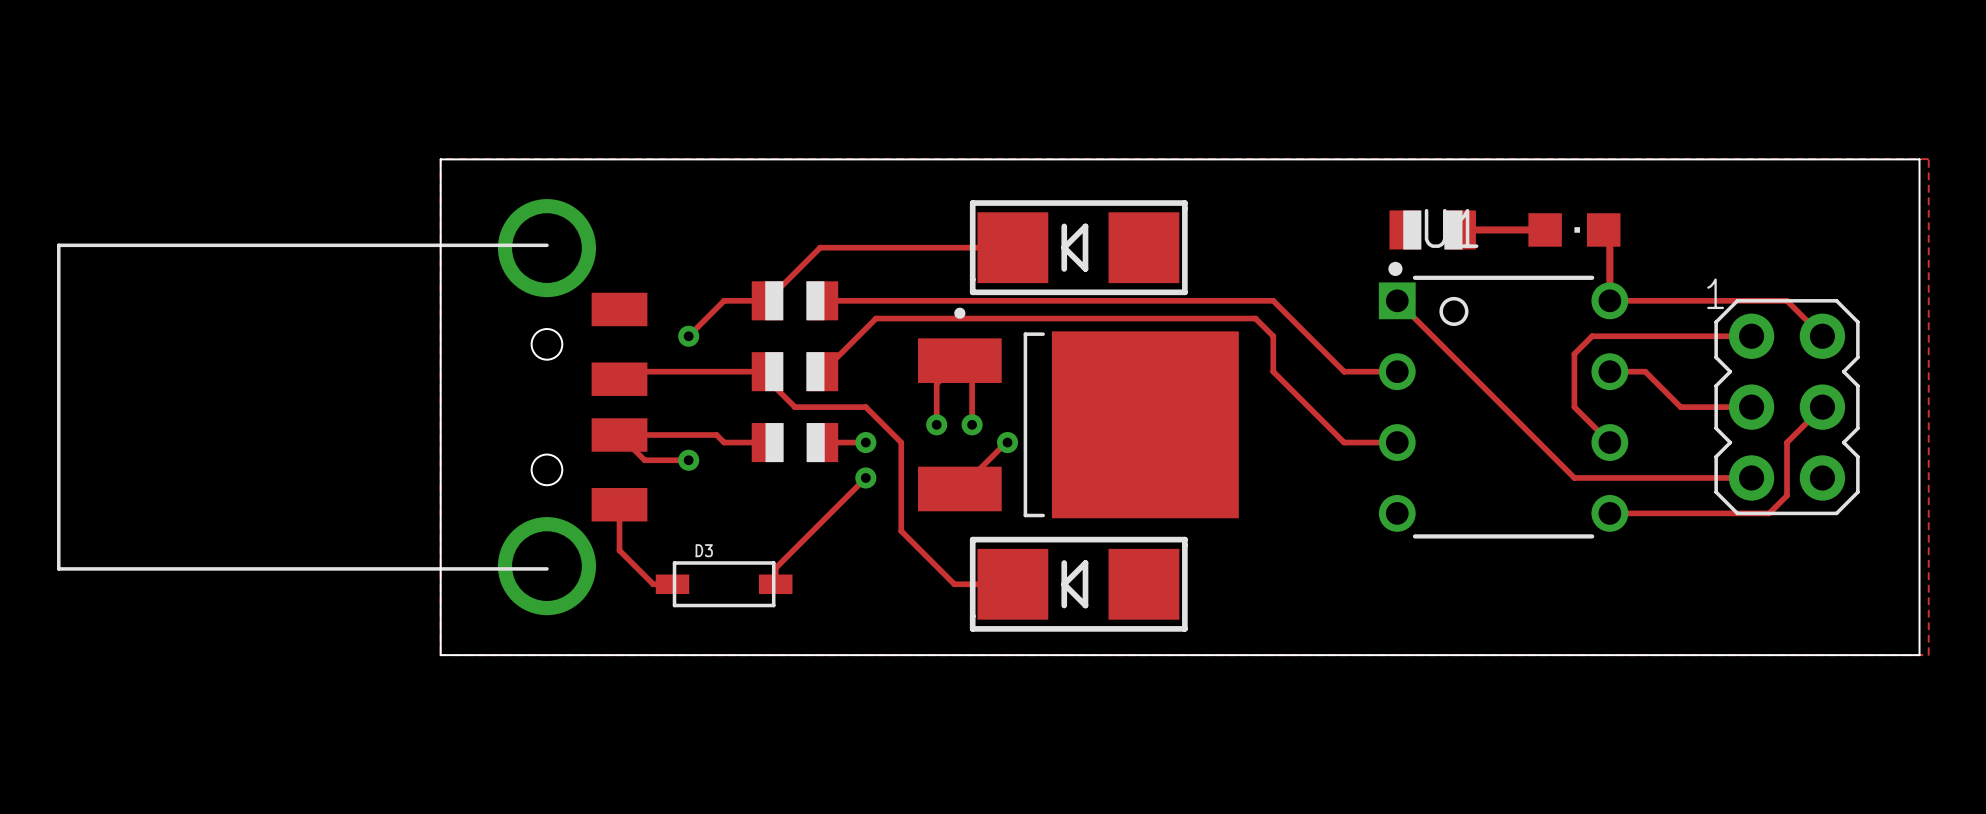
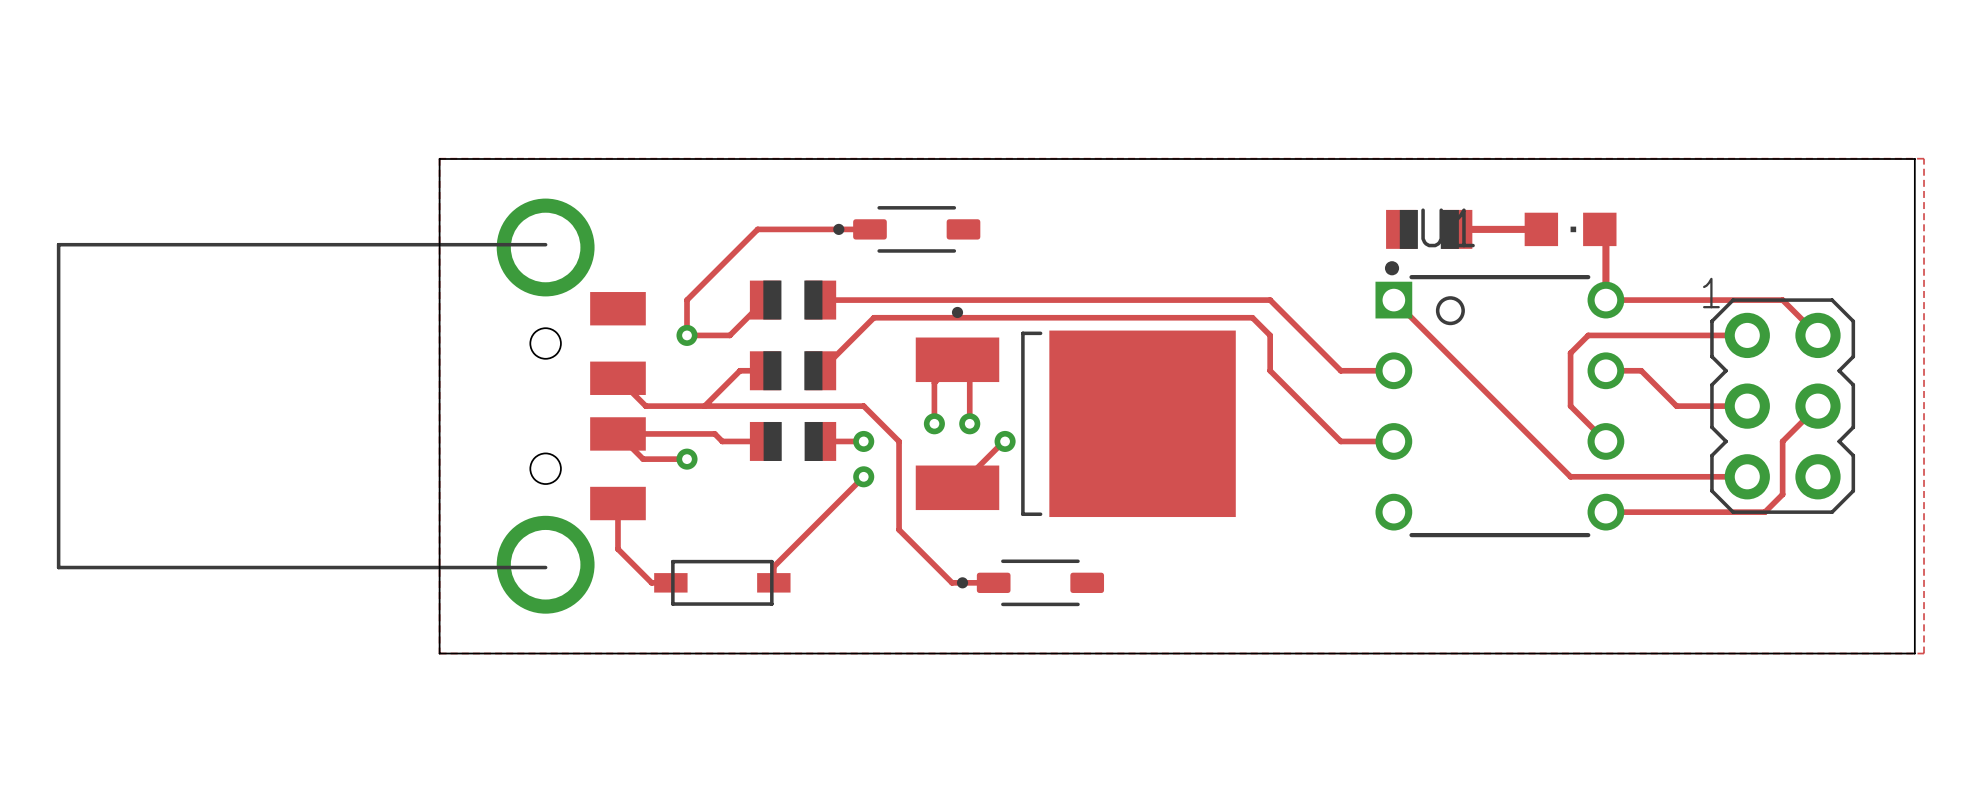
track: none -> (869, 229) (757, 229) (687, 300) (687, 335) (729, 335) (765, 300)
part: none -> (906, 229)
track: (1012, 247) (820, 247) (767, 300) (724, 300) (688, 336) -> none
part: (1078, 247) -> none
track: (627, 371) (741, 371) -> (704, 406) (740, 370)
track: (767, 379) (794, 407) -> (617, 378) (645, 406) (793, 406)
D3 name: D3 (704, 550) -> none
part: none -> (1030, 582)
part: (1078, 584) -> none

